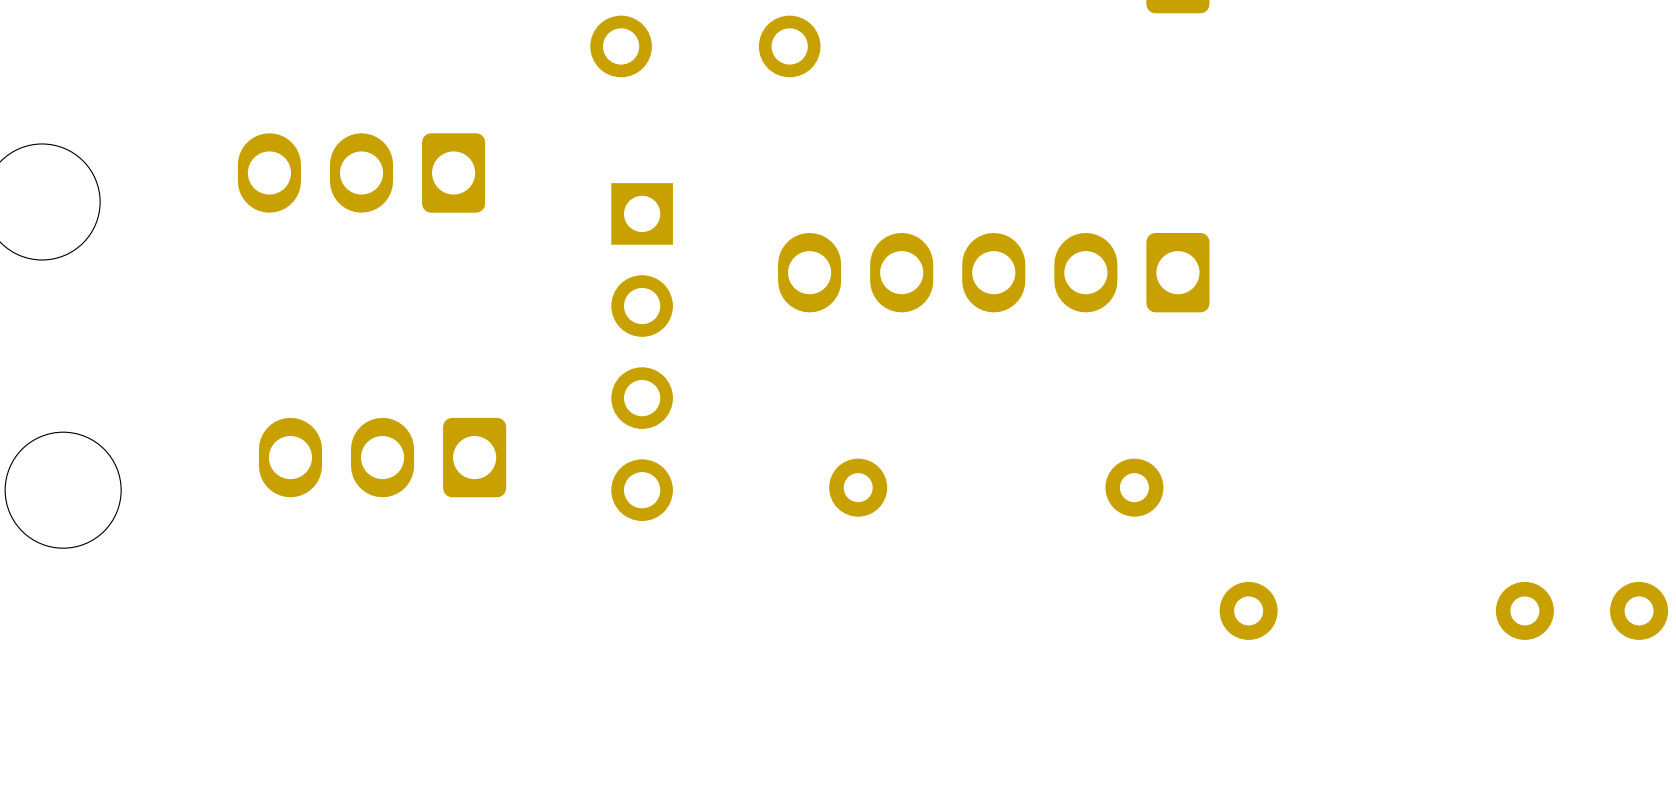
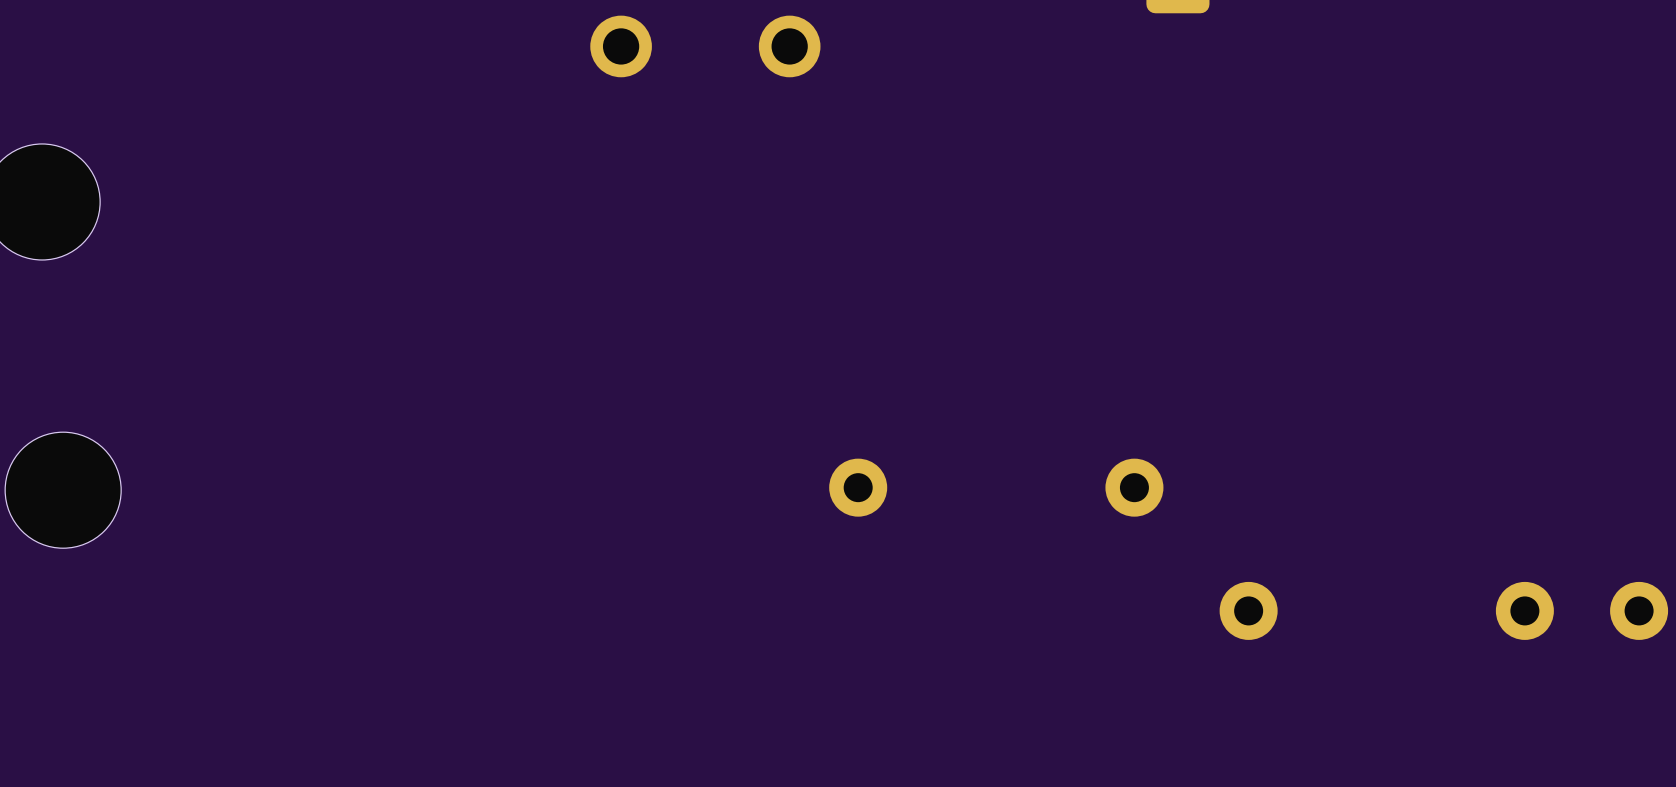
part: (361, 172) -> none
part: (993, 272) -> none
part: (642, 352) -> none
part: (382, 457) -> none

